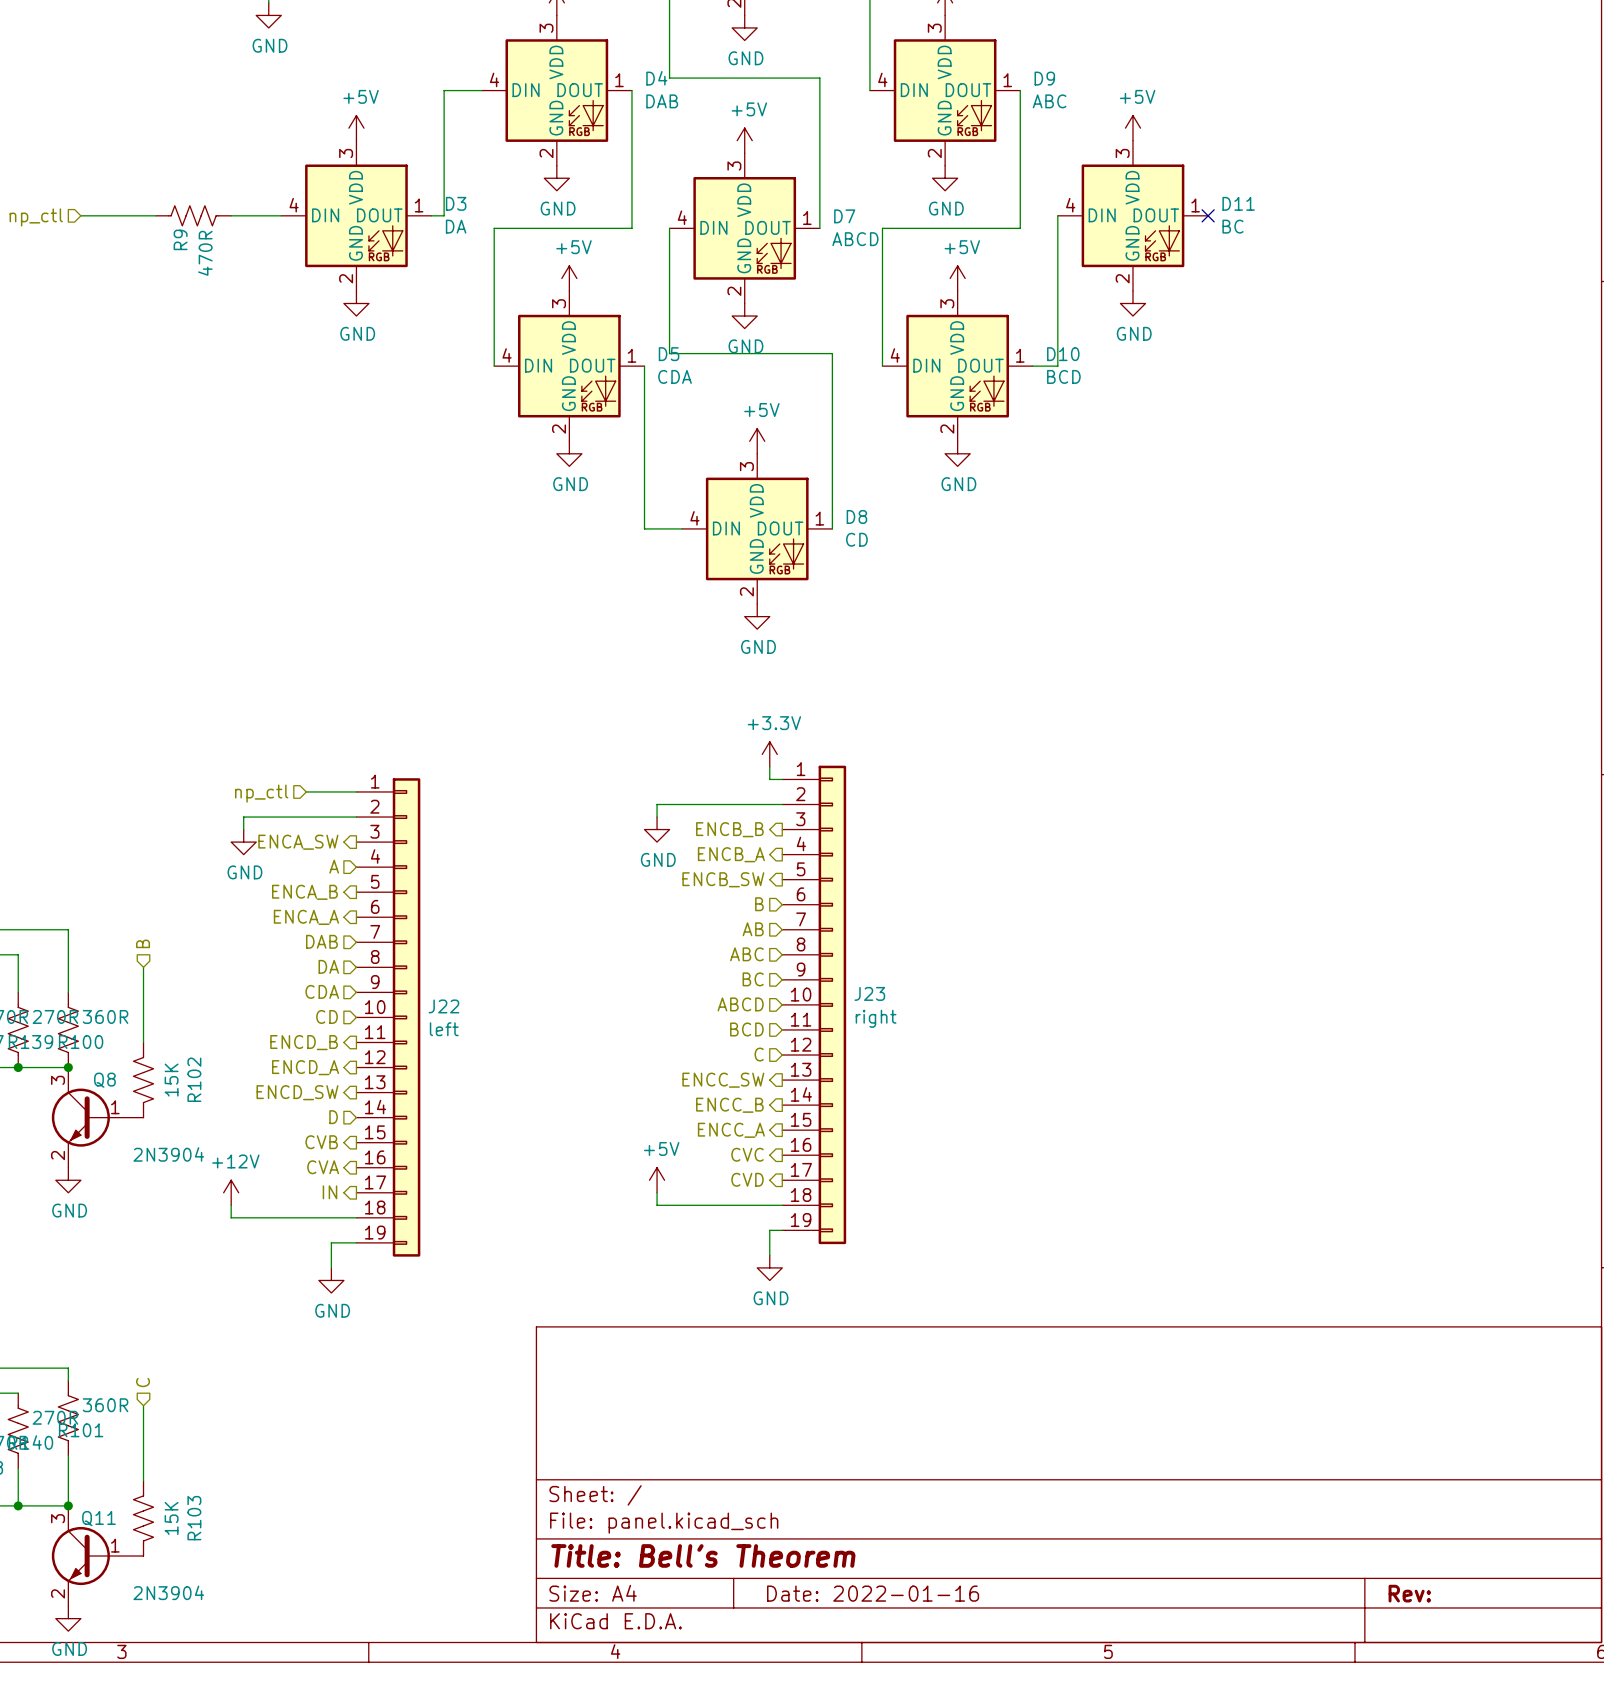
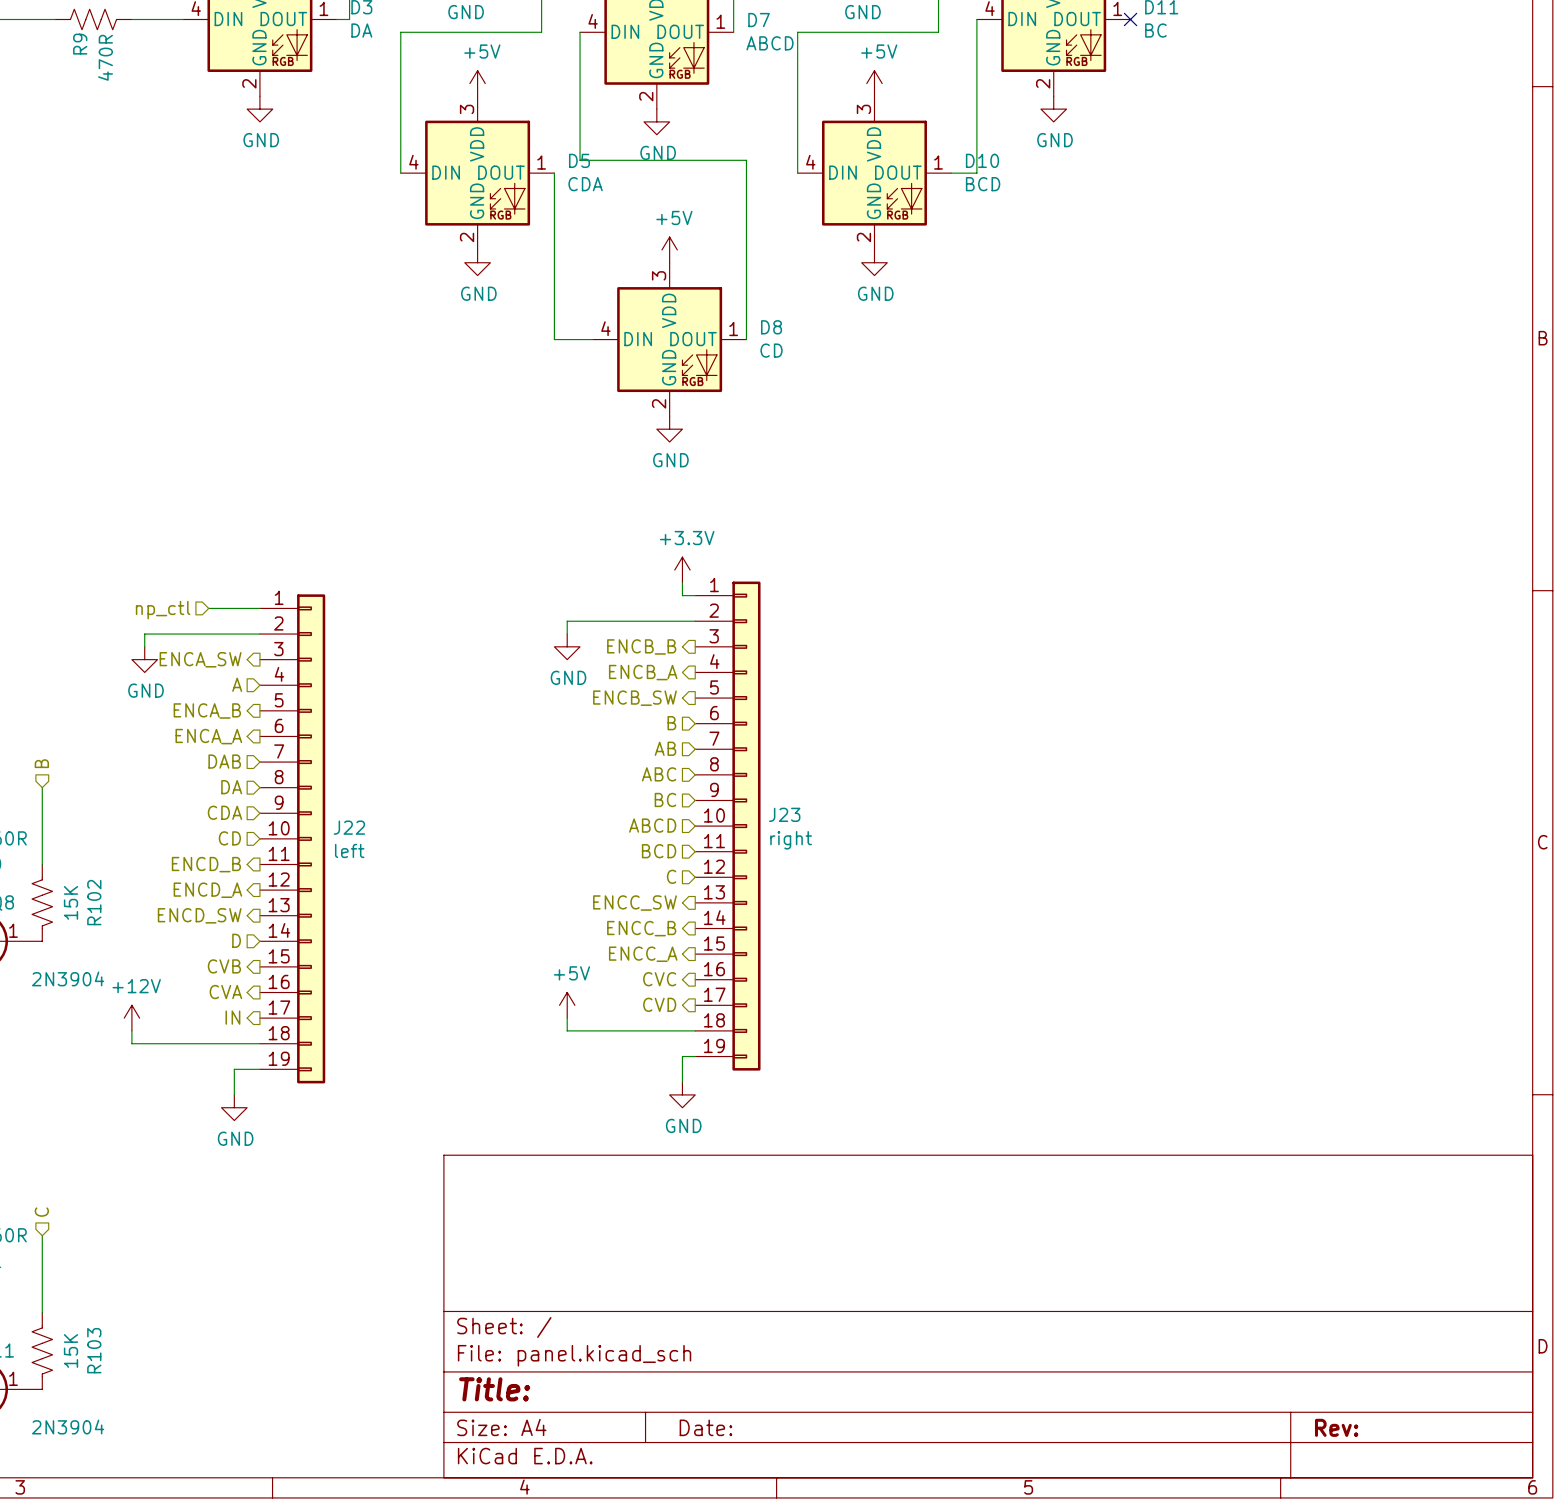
title block: Title: Bell's Theorem (703, 1555) -> Title: (494, 1389)
title block: Date: 2022-01-16 (873, 1593) -> Date: (705, 1427)

